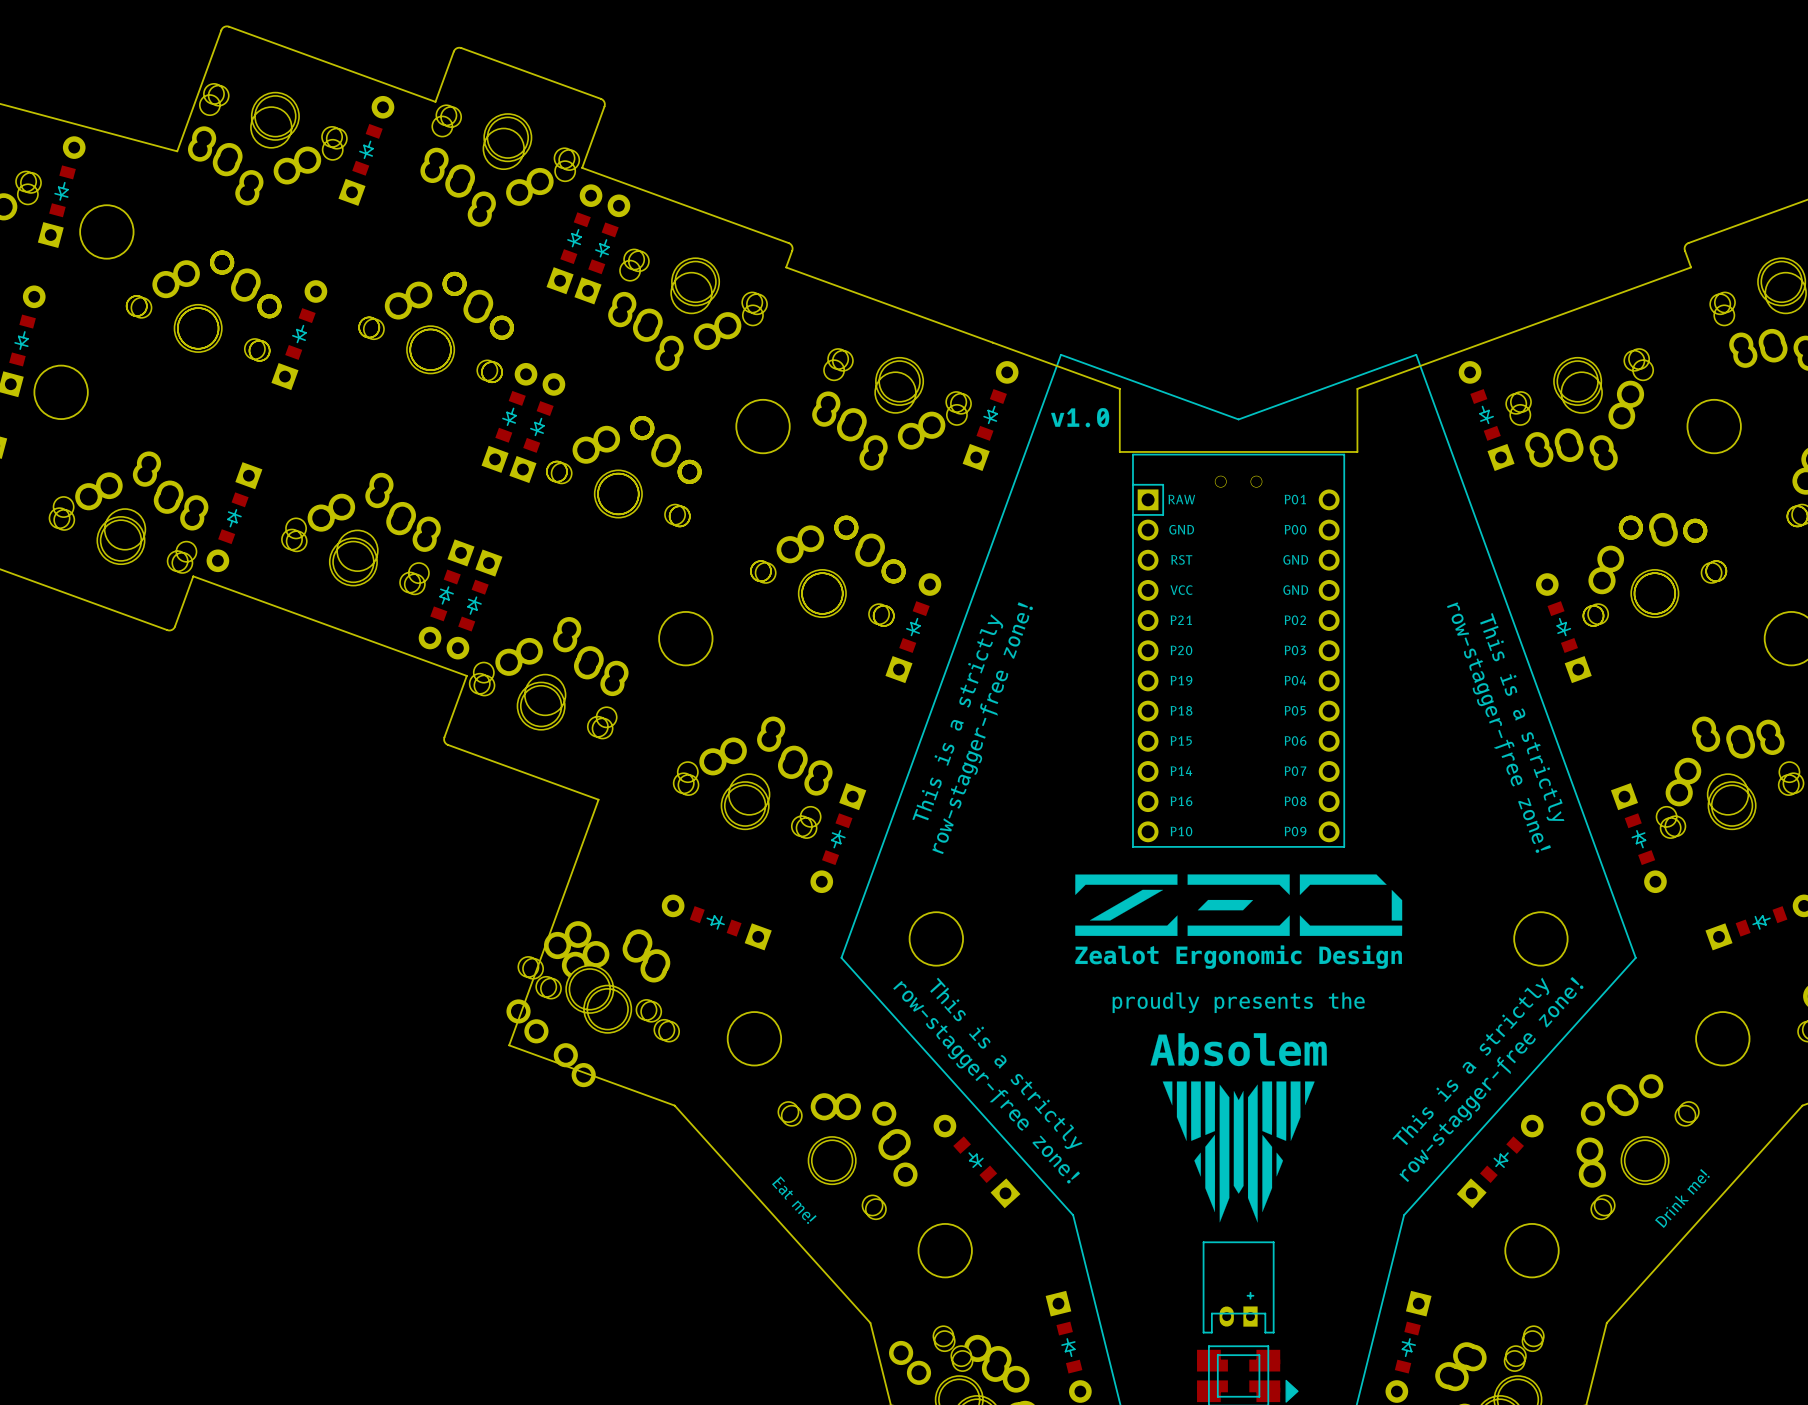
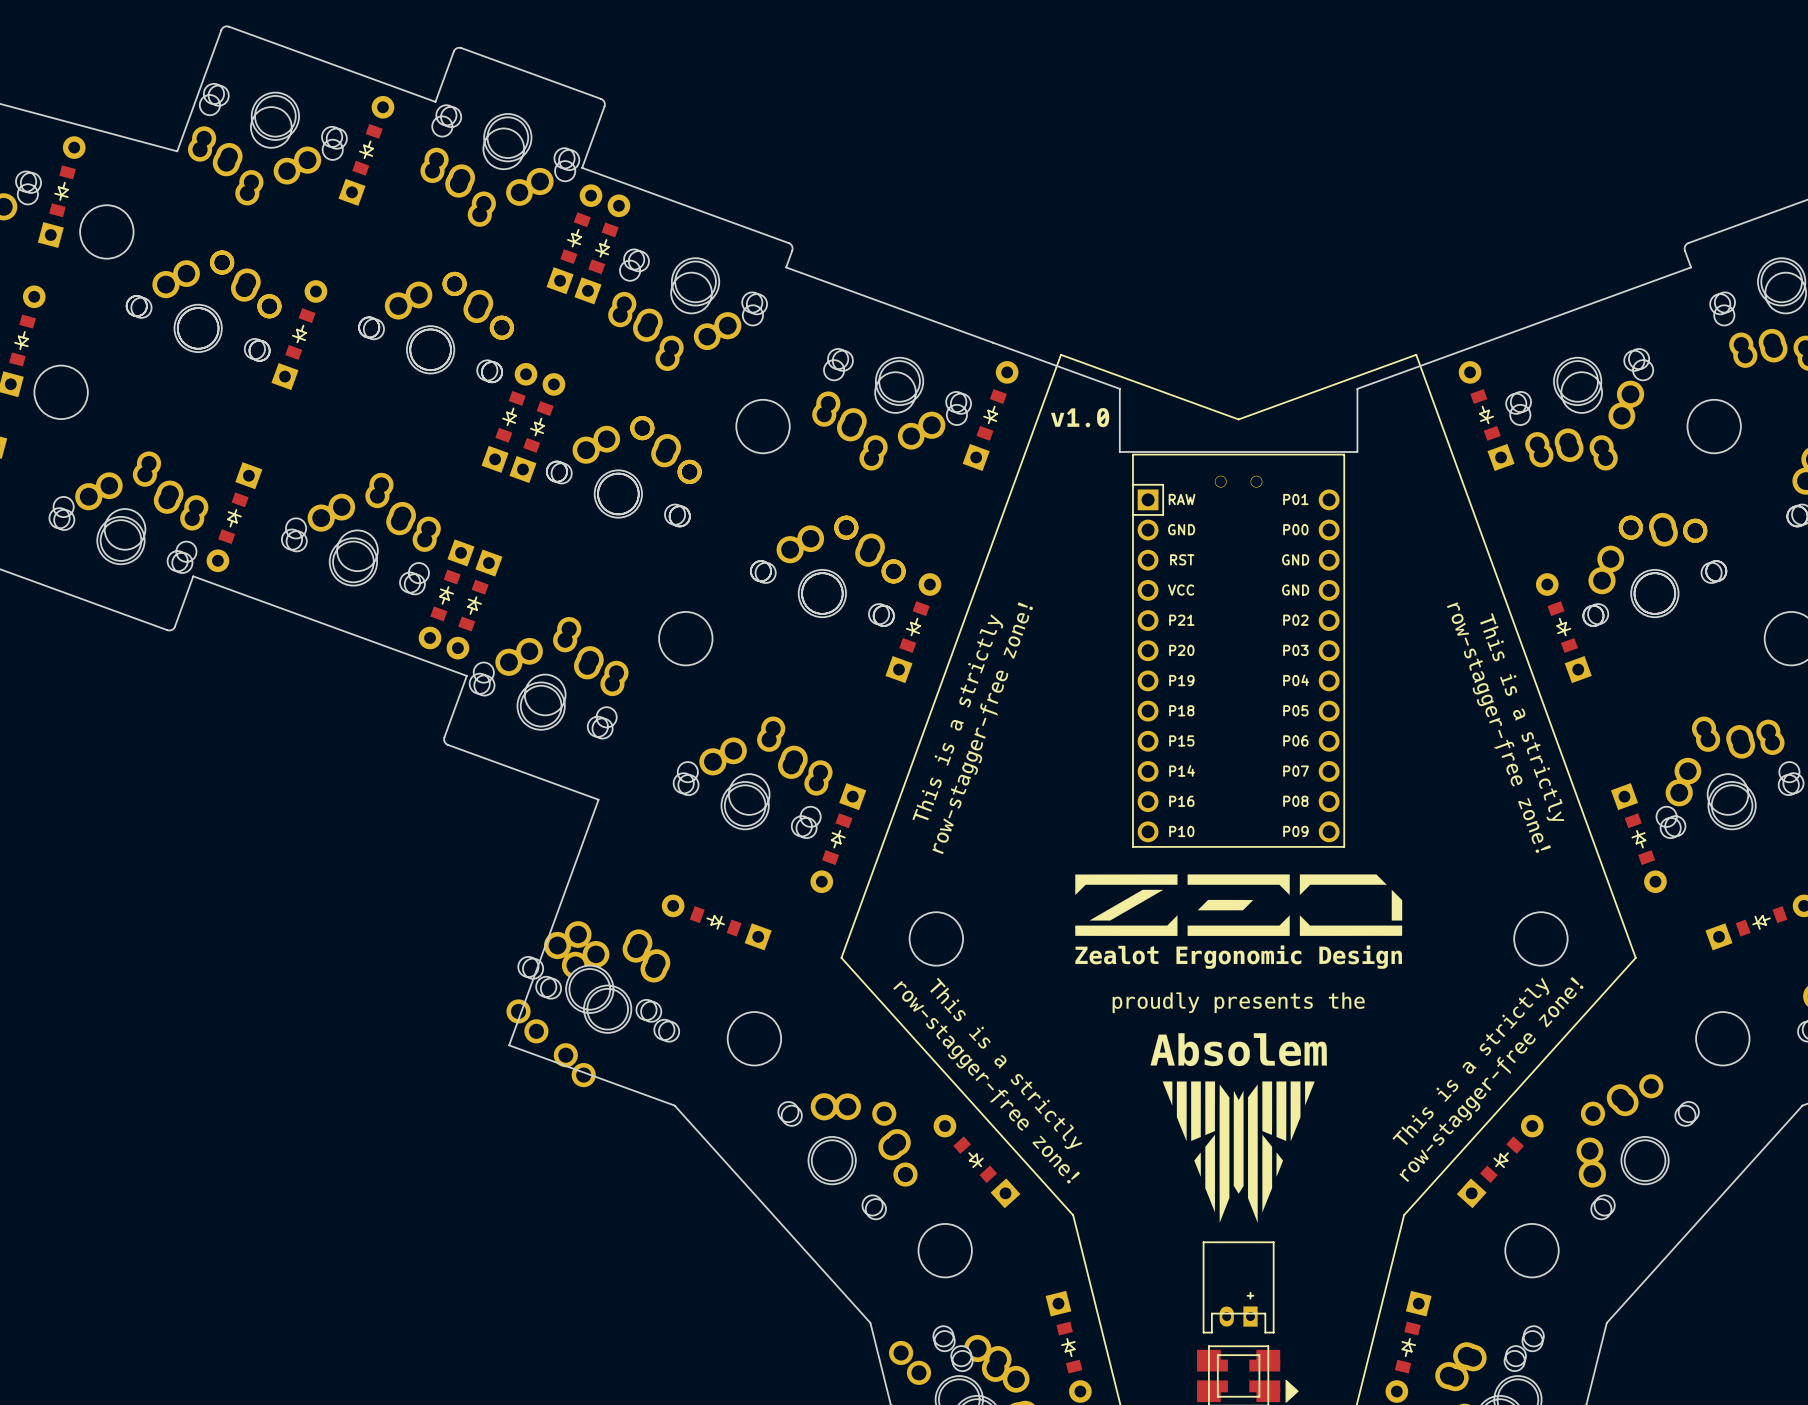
text: Drink me! (1682, 1198) -> none
text: Eat me! (794, 1200) -> none

